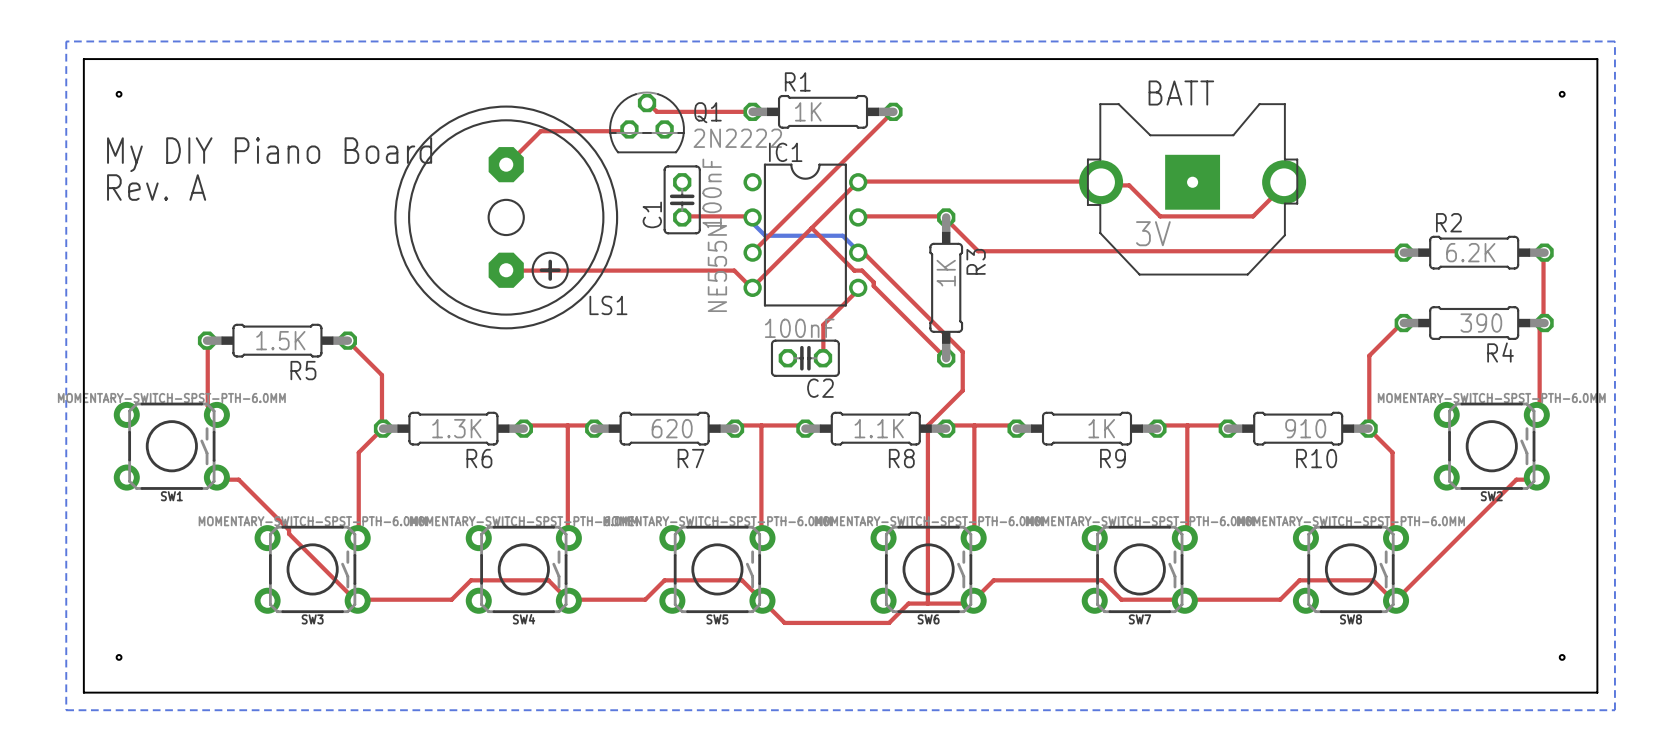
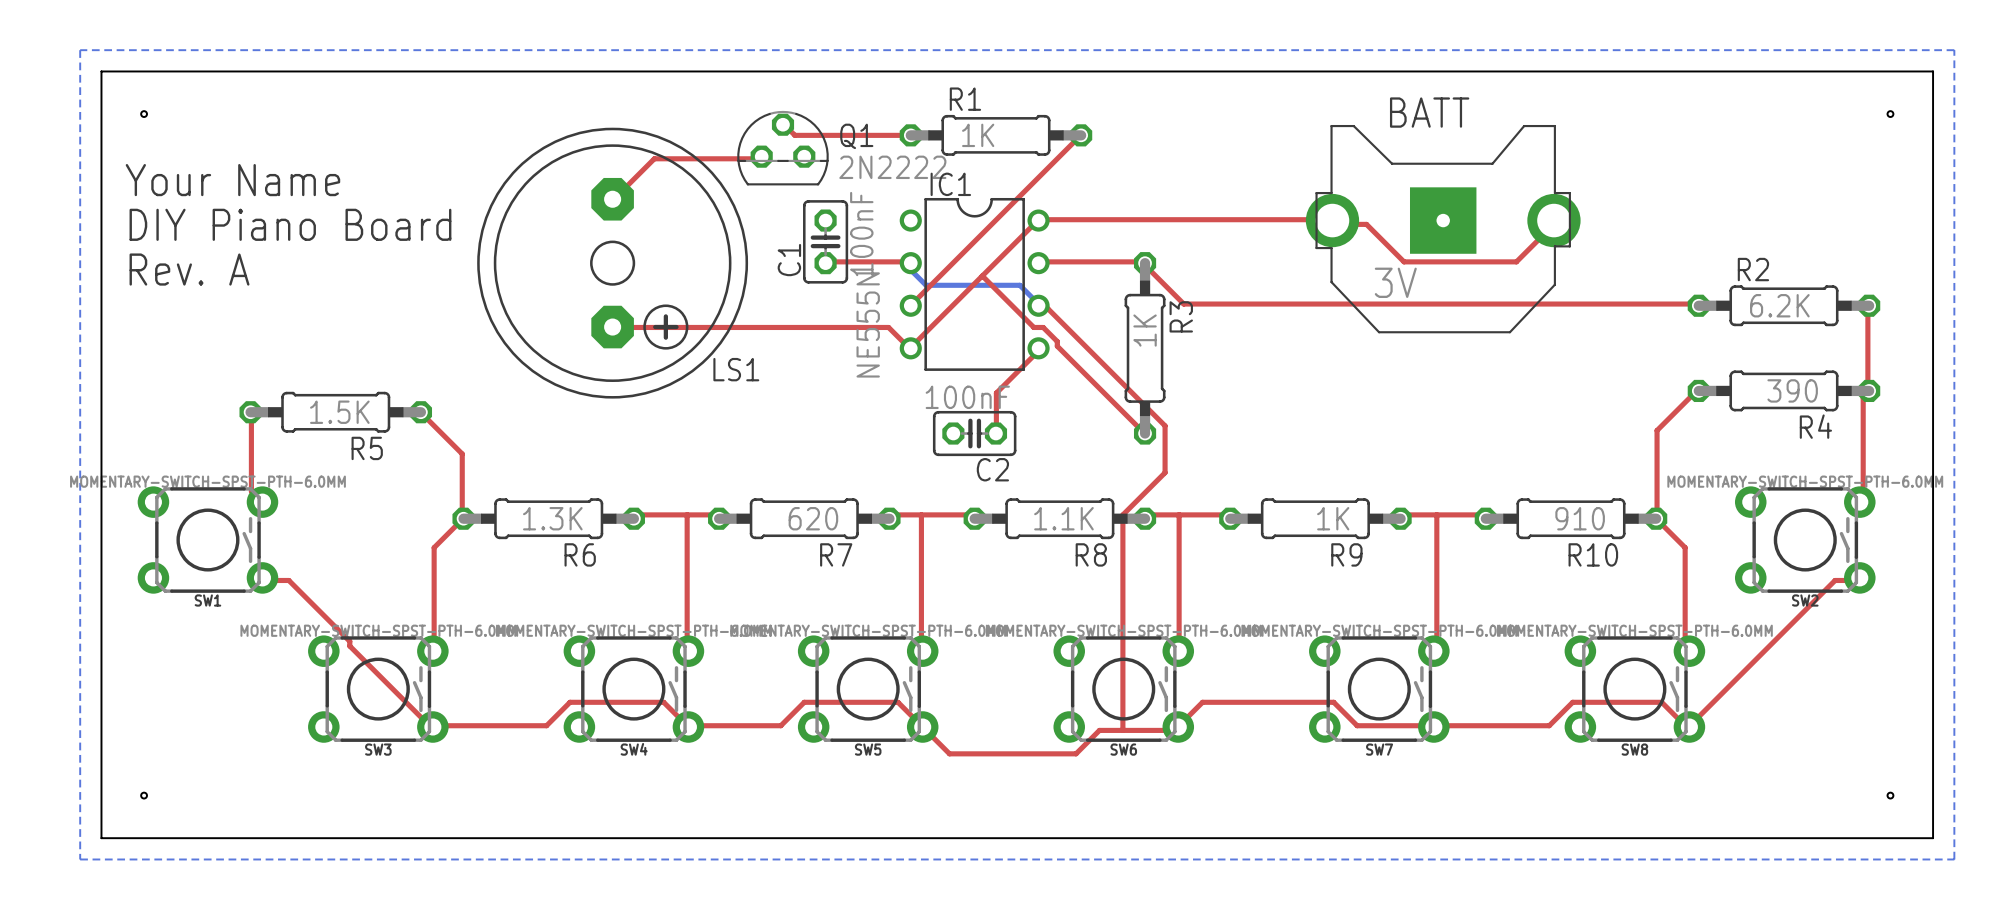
text: My DIY Piano Board (269, 154) -> Your Name (232, 180)
text: none -> DIY Piano Board (290, 224)
text position: Rev. A (156, 187) -> Rev. A (189, 269)

